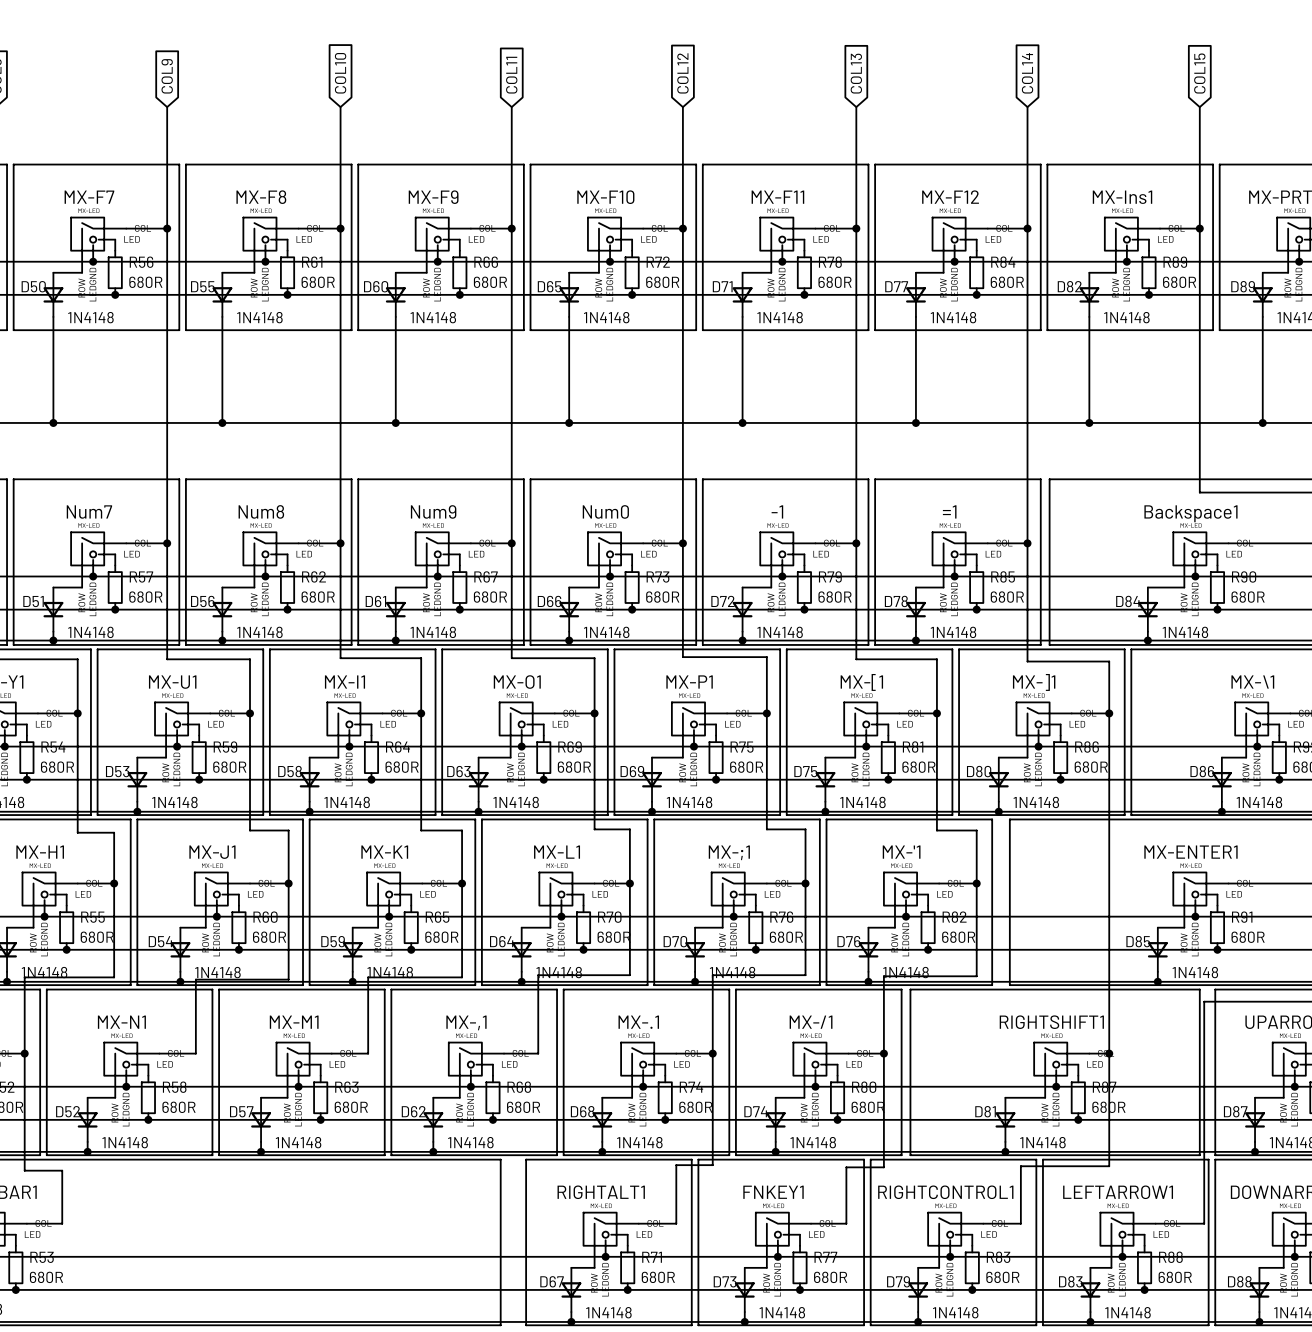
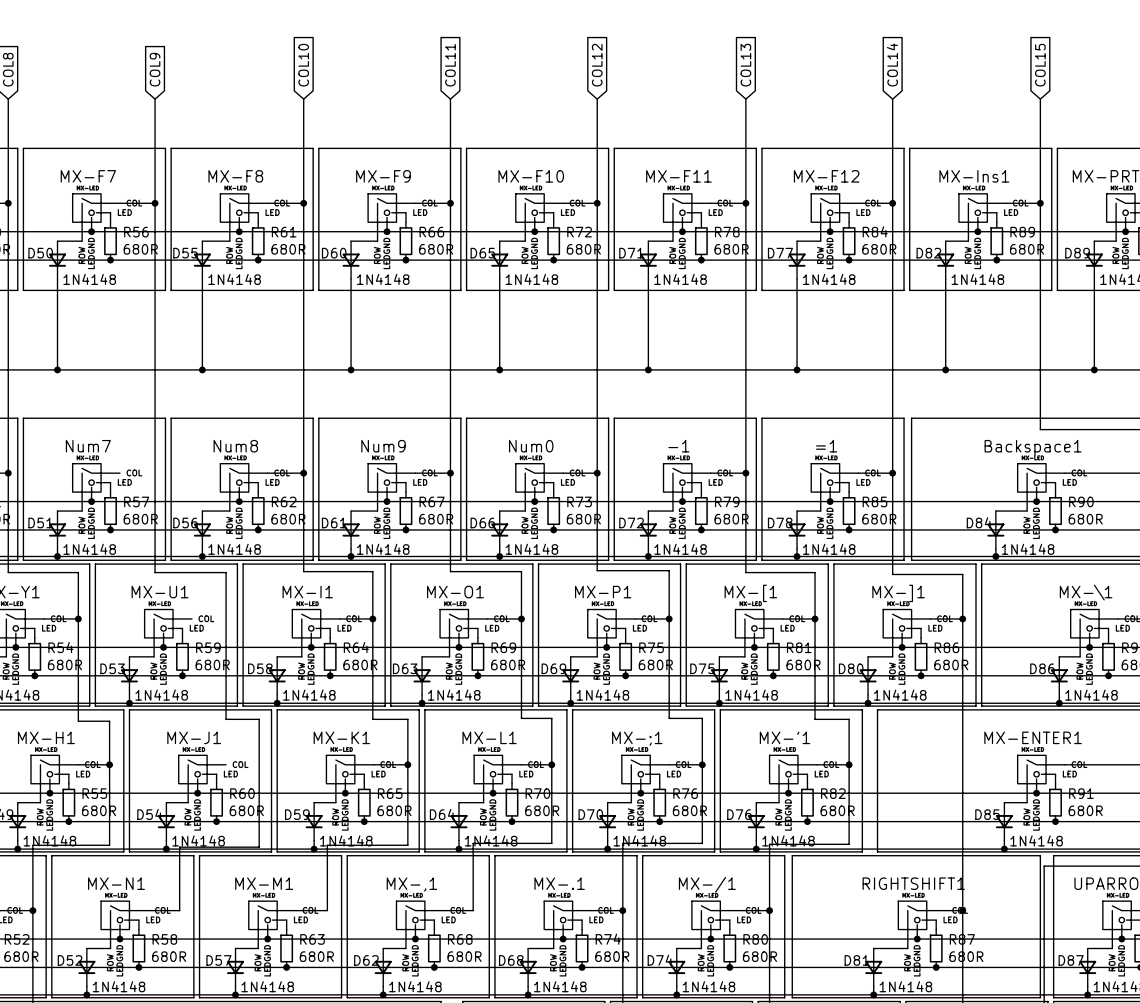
wire: (126, 543) (167, 543) -> none
junction: (167, 543) -> none
wire: (210, 713) (250, 713) -> none
junction: (250, 713) -> none
wire: (250, 883) (288, 883) -> none
junction: (288, 883) -> none

